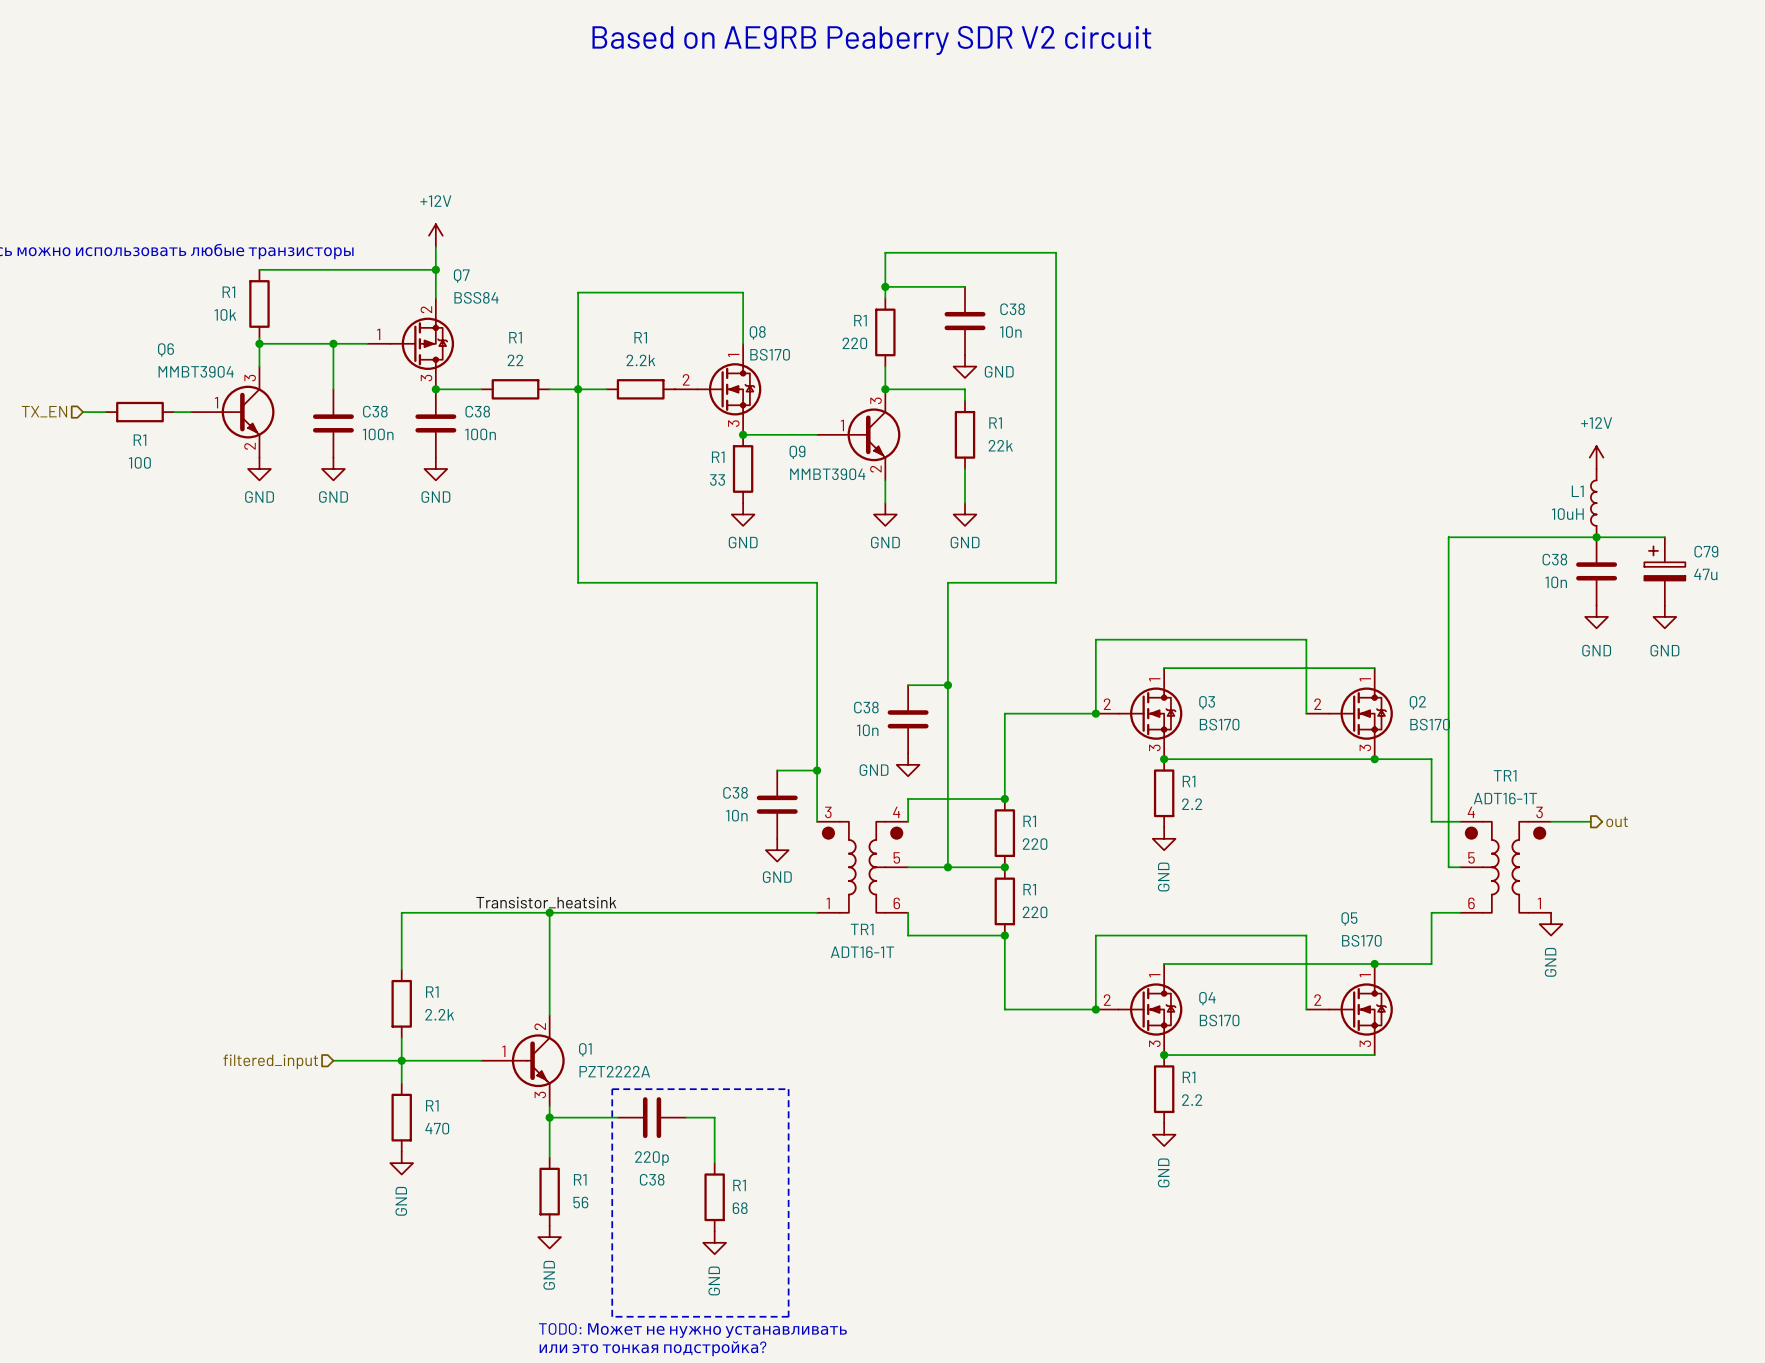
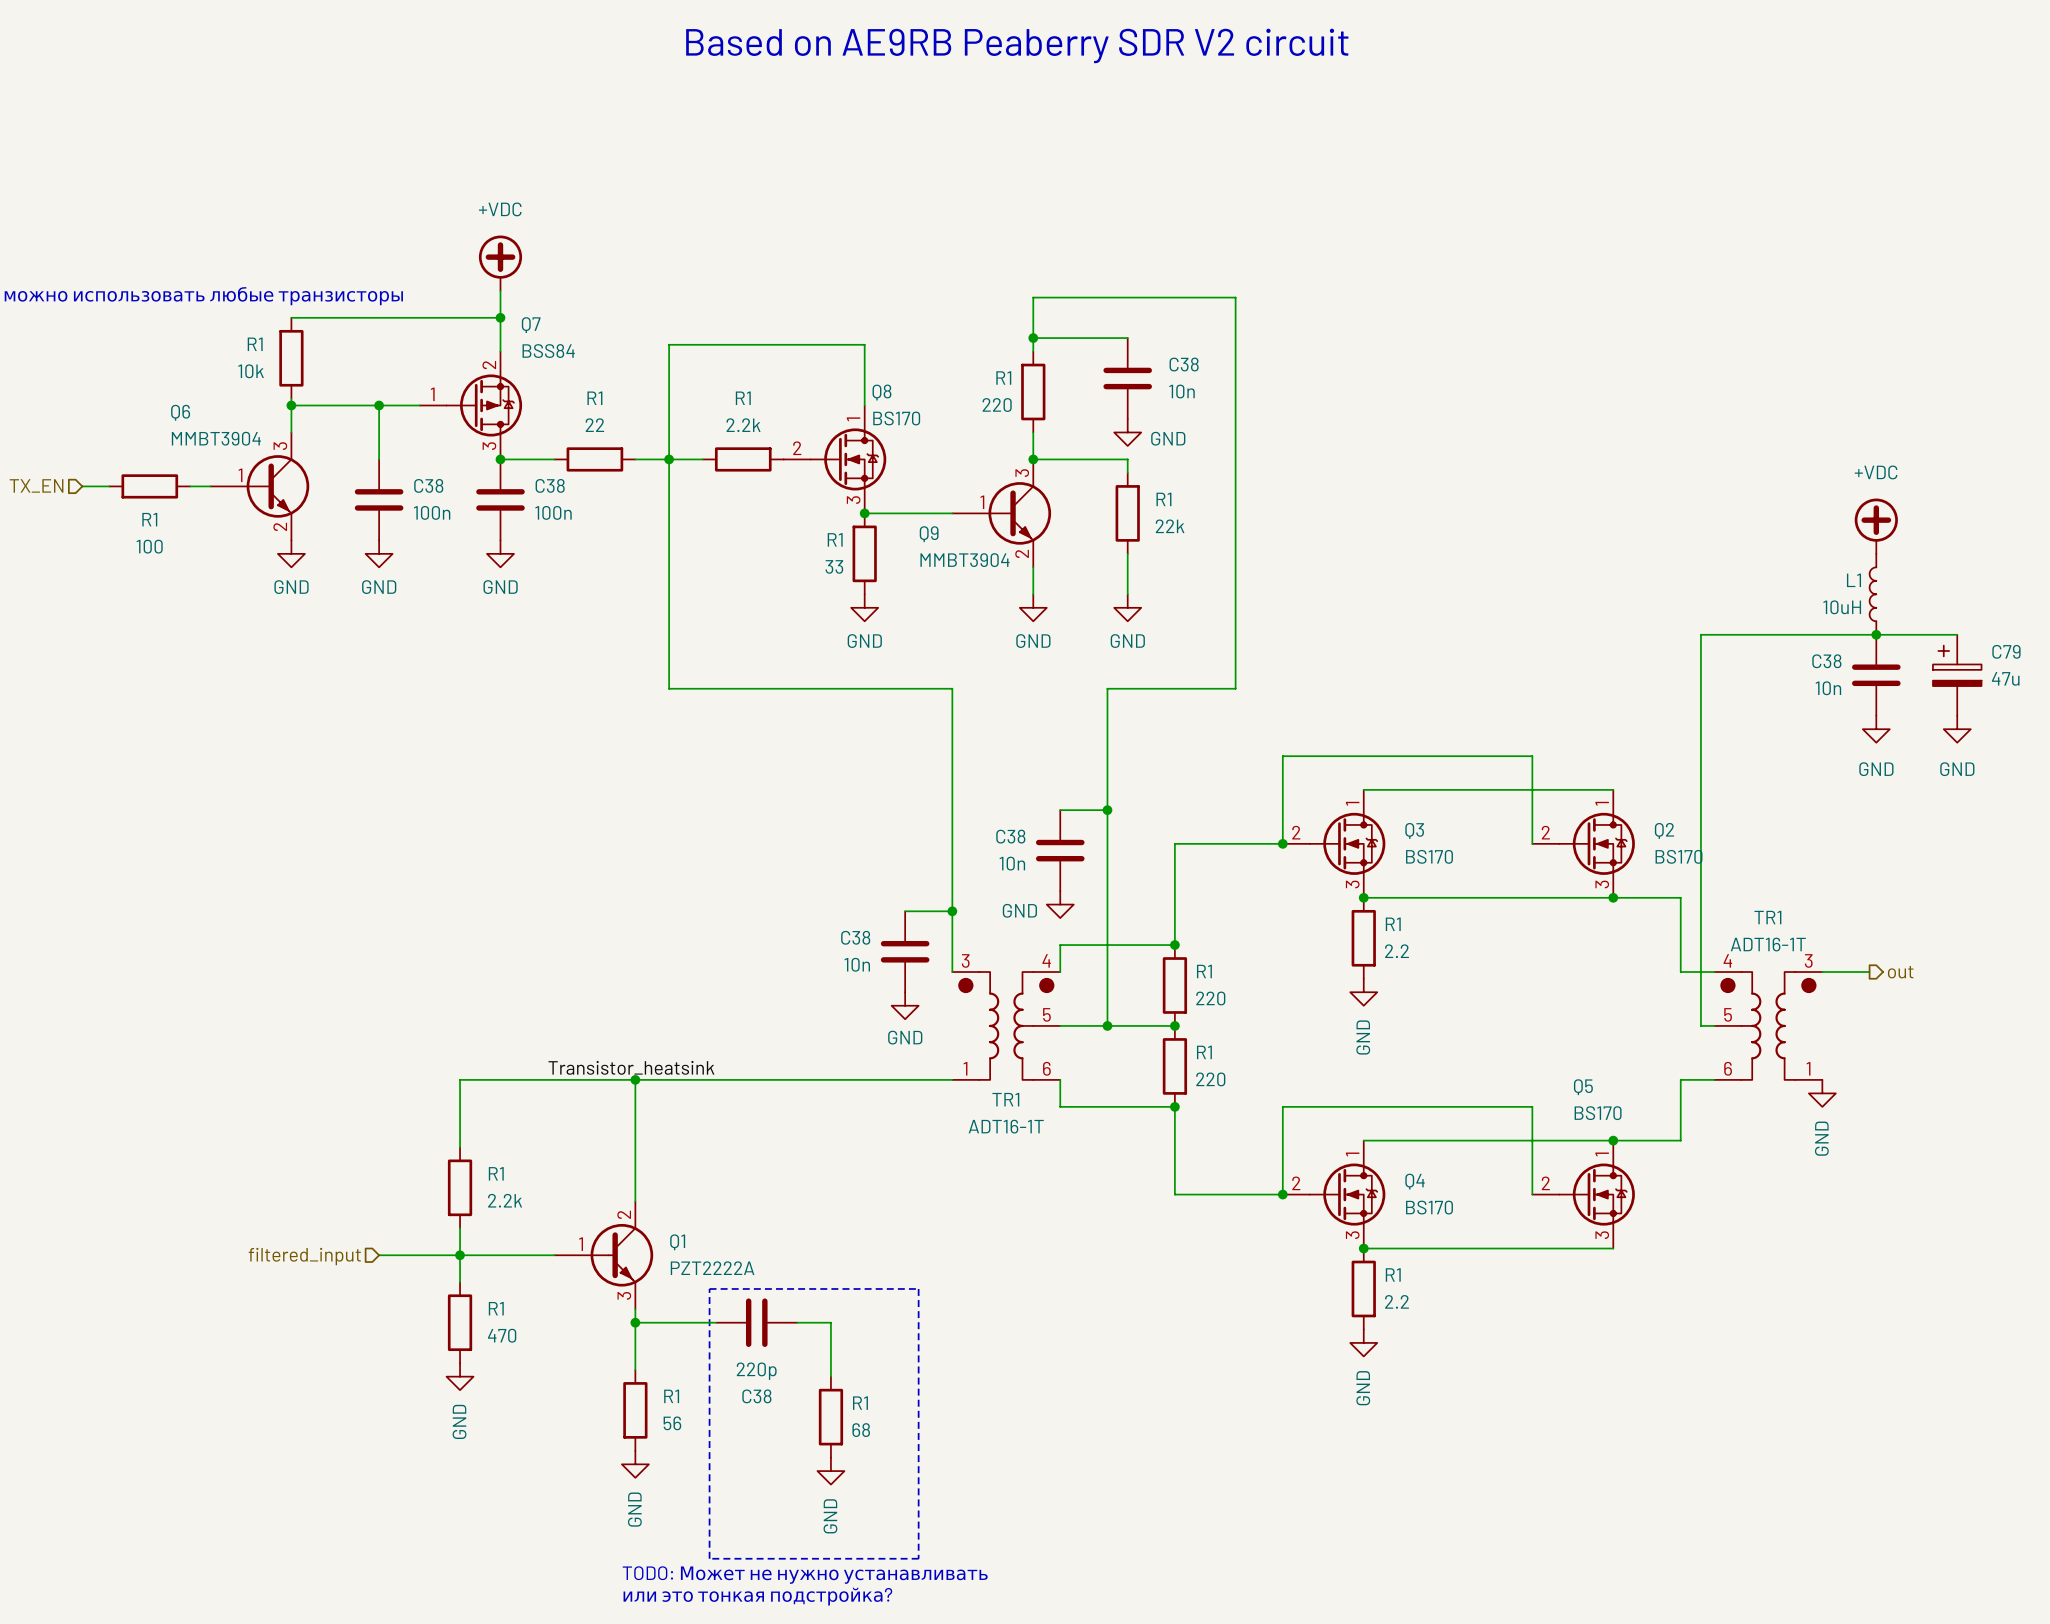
power symbol: none -> +VDC (500, 263)
power symbol: +12V (435, 235) -> none
power symbol: none -> +VDC (1876, 526)
power symbol: +12V (1596, 457) -> none

